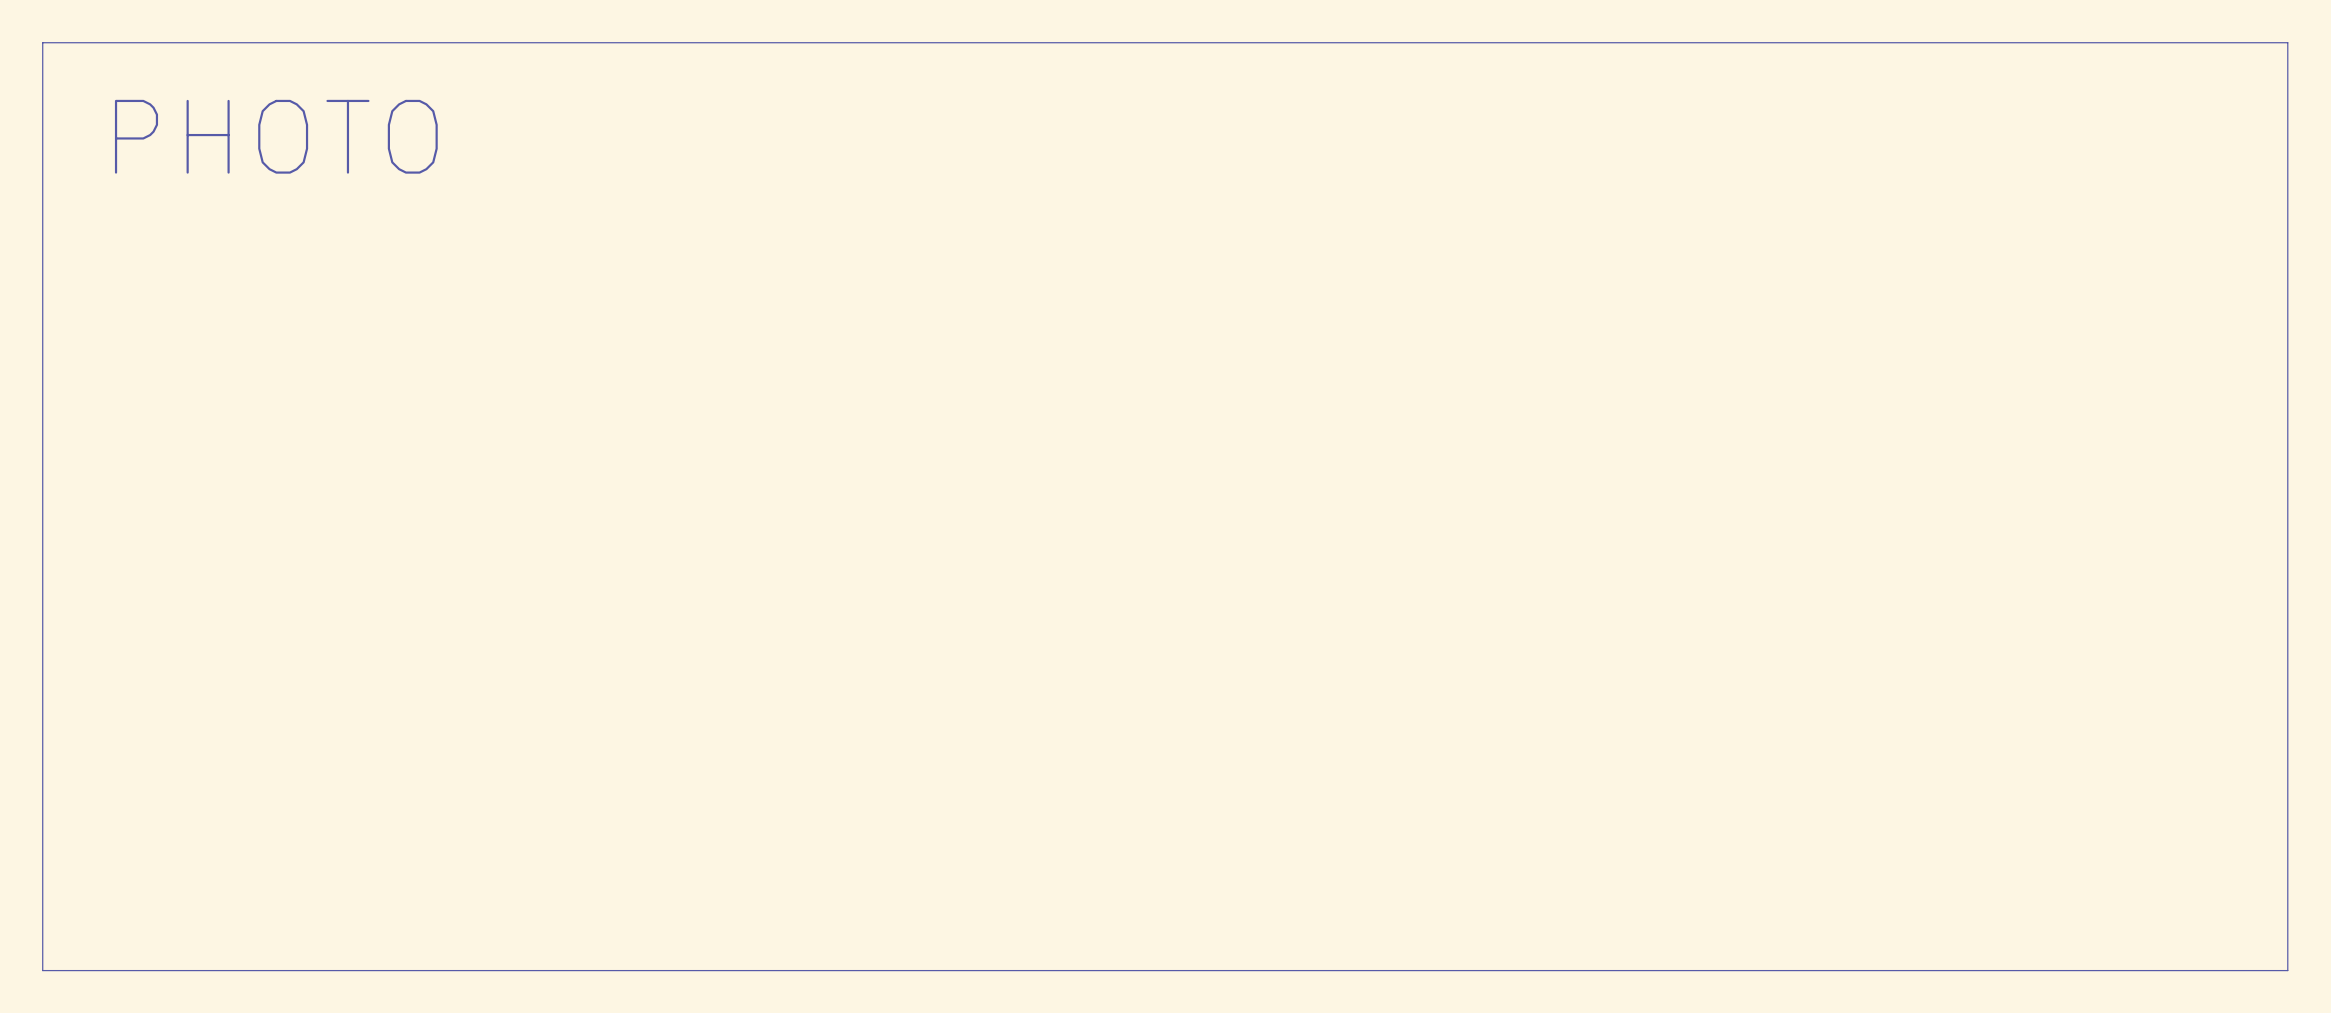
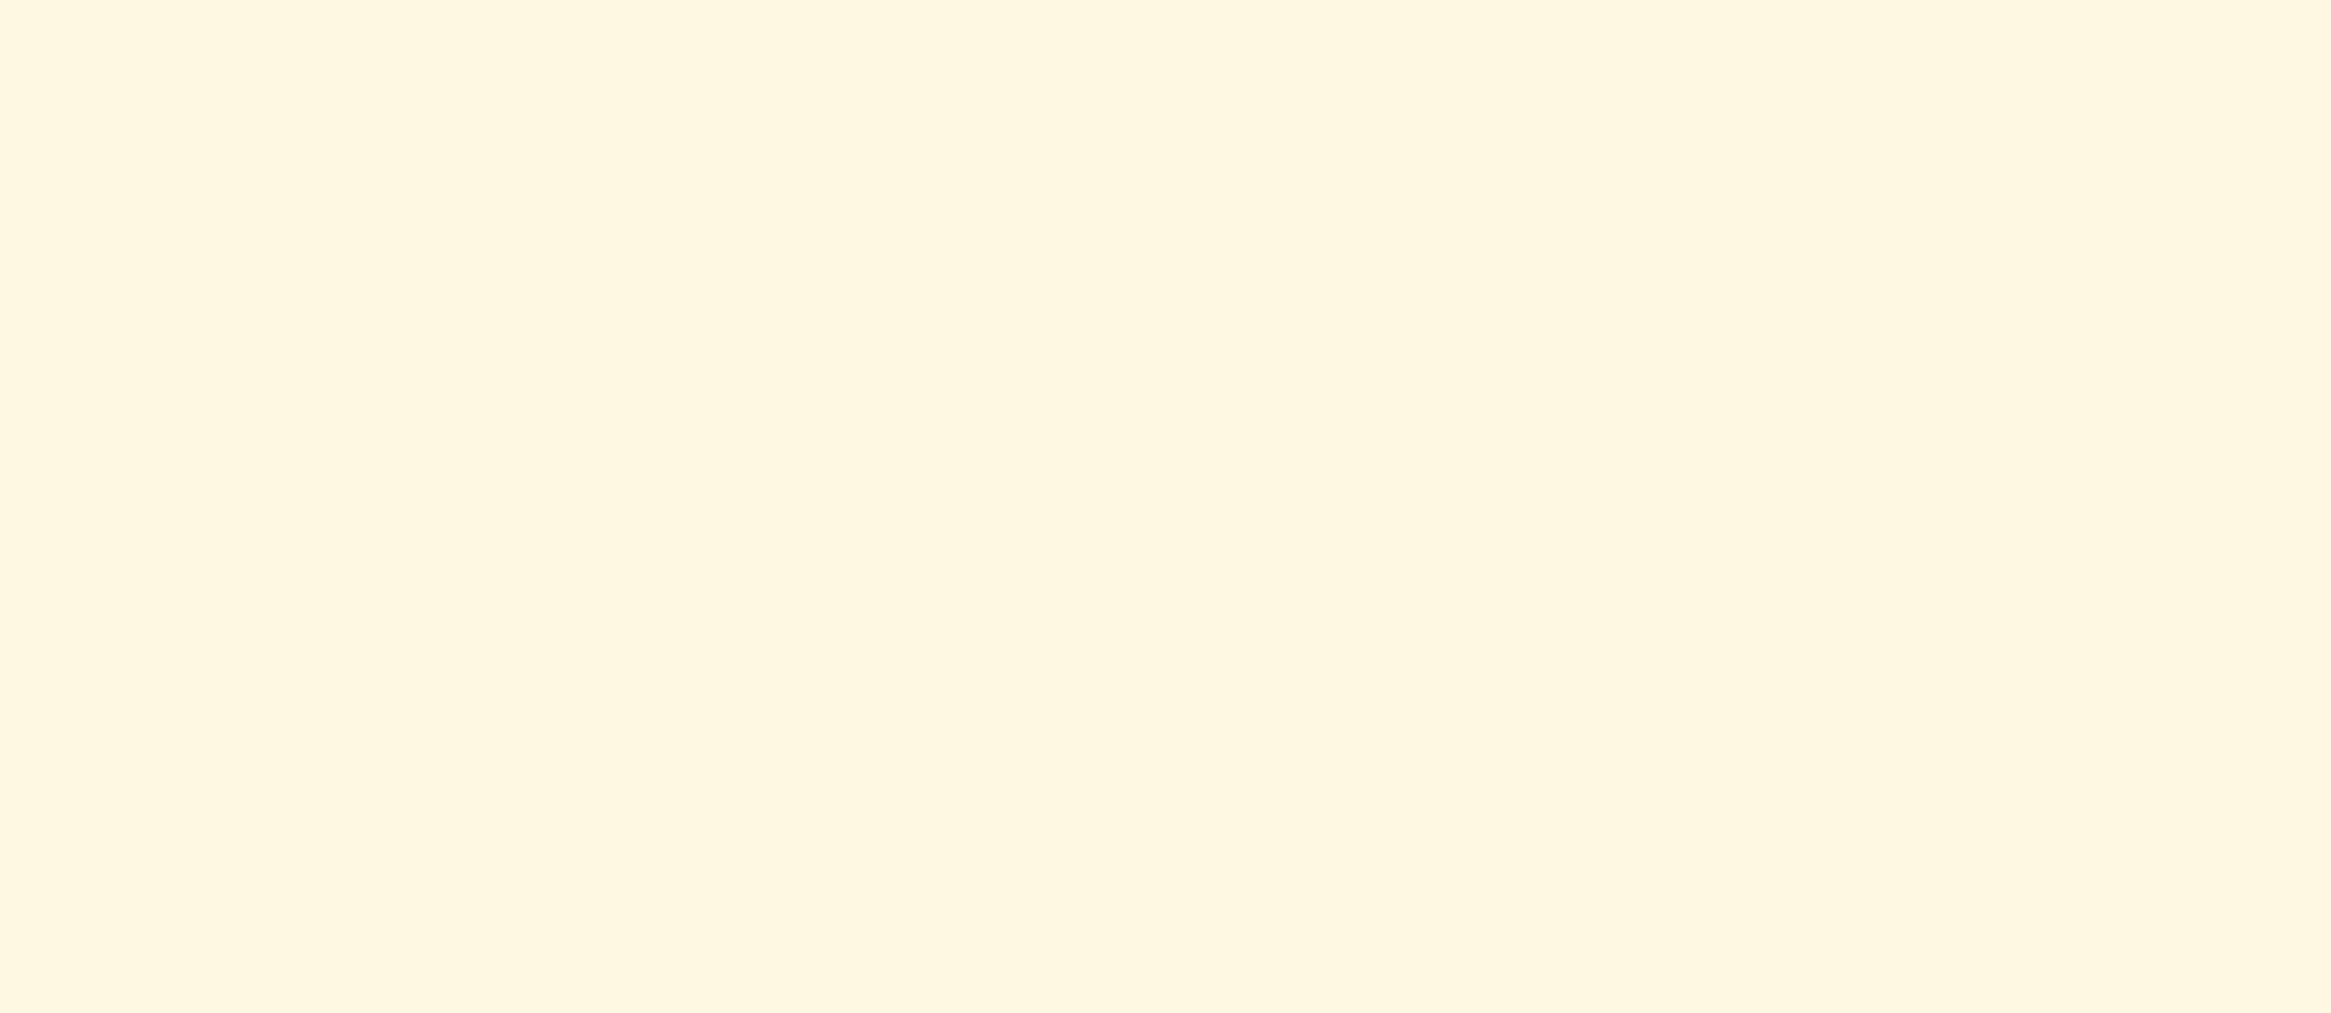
line: (42, 42) (2287, 42) (2287, 970) (42, 970) (42, 42) -> none
text: PHOTO (276, 136) -> none

